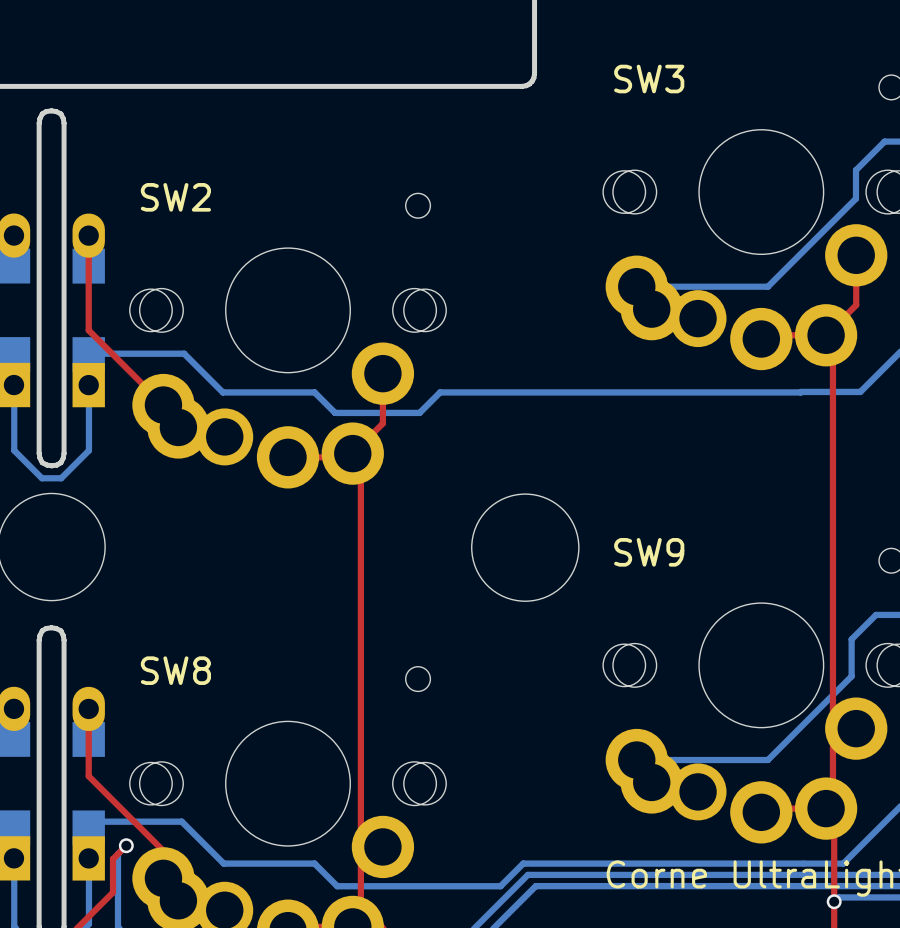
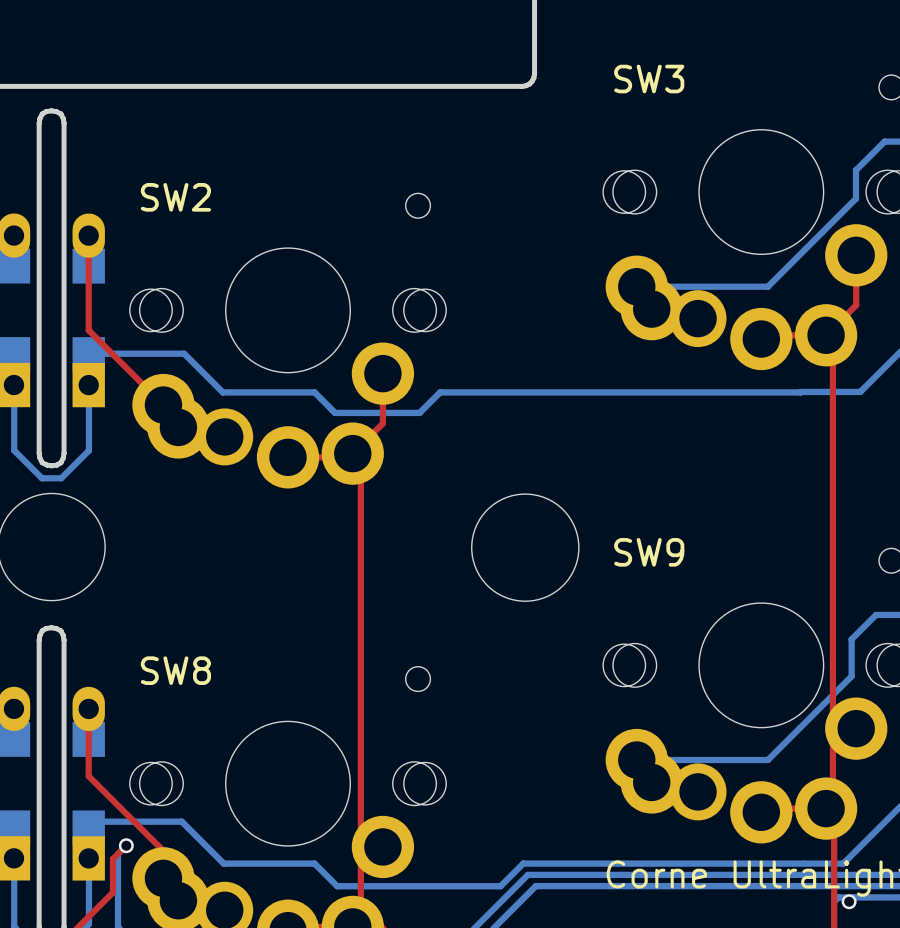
via position: (834, 901) -> (849, 901)

